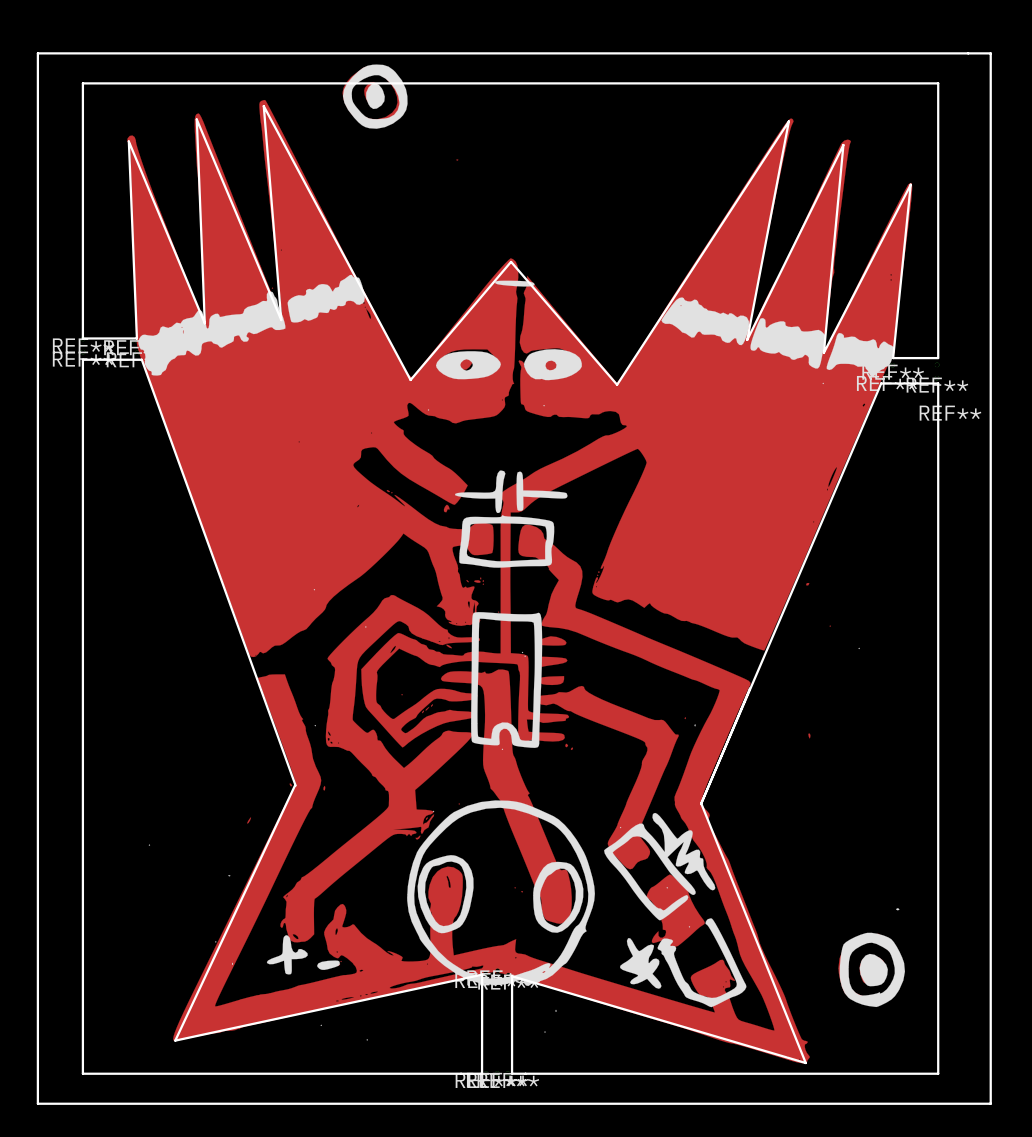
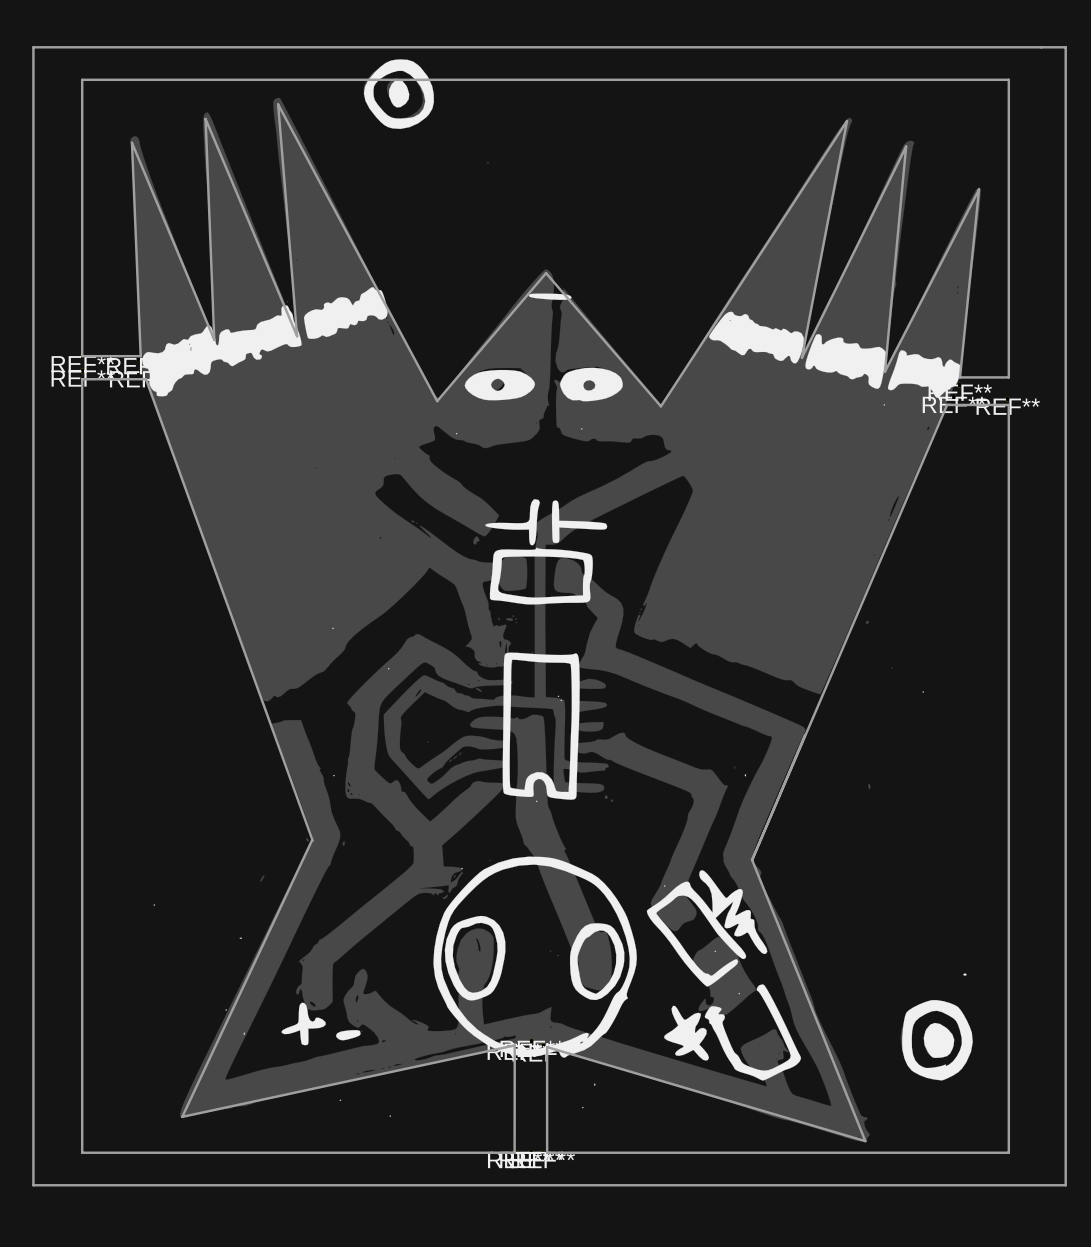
REF**: (937, 364) -> none

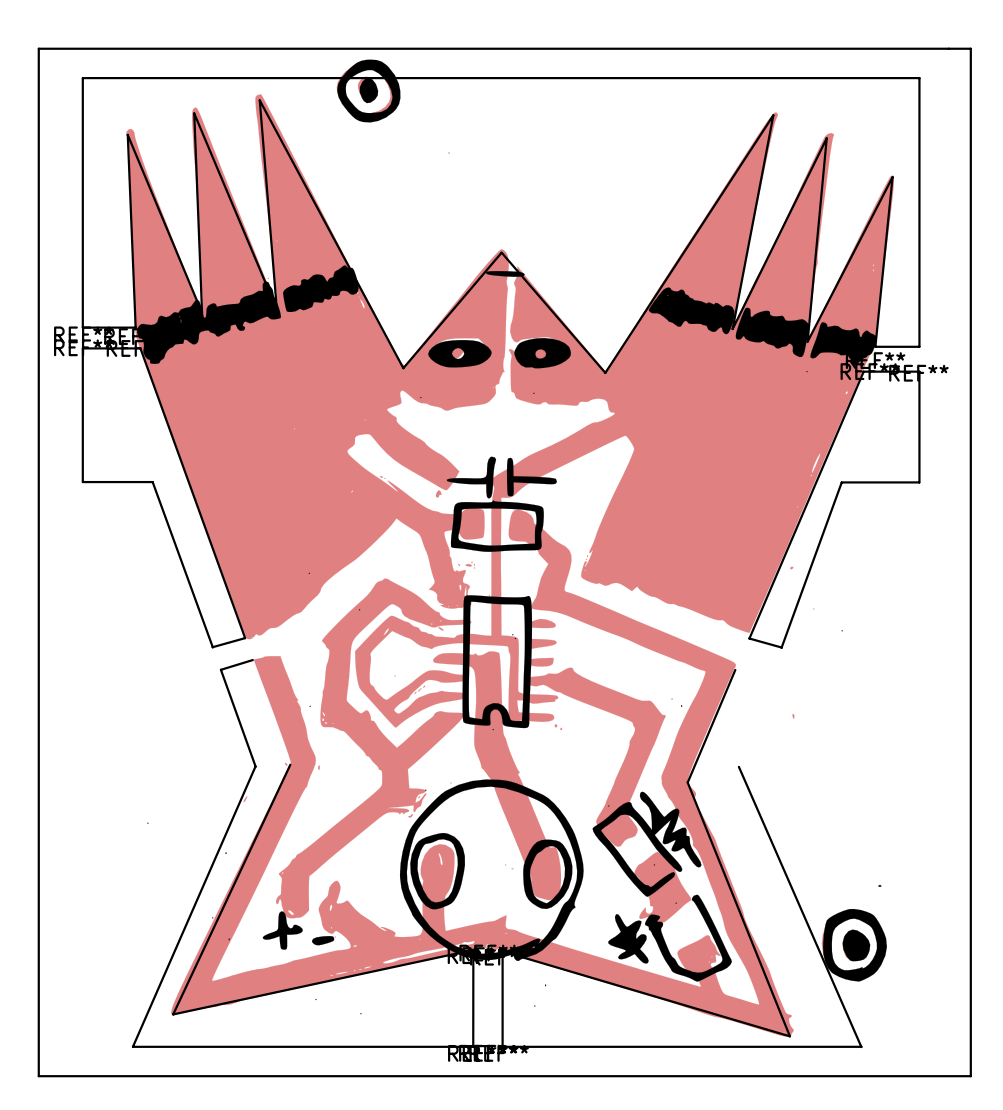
board edge: (145, 379) (312, 840) -> (140, 348) (245, 638) (212, 647)
board edge: (947, 404) (752, 860) -> (863, 371) (749, 638)
board edge: (82, 527) (82, 1152) (137, 1152) -> (255, 766) (132, 1046)
board edge: none -> (82, 482) (152, 482)
board edge: none -> (152, 482) (212, 647)
board edge: none -> (841, 482) (919, 482)
board edge: none -> (841, 482) (781, 647)
board edge: (1008, 527) (1008, 1152) (944, 1152) -> (738, 766) (861, 1047)
board edge: none -> (749, 638) (781, 647)
board edge: none -> (252, 660) (220, 669) (255, 766)

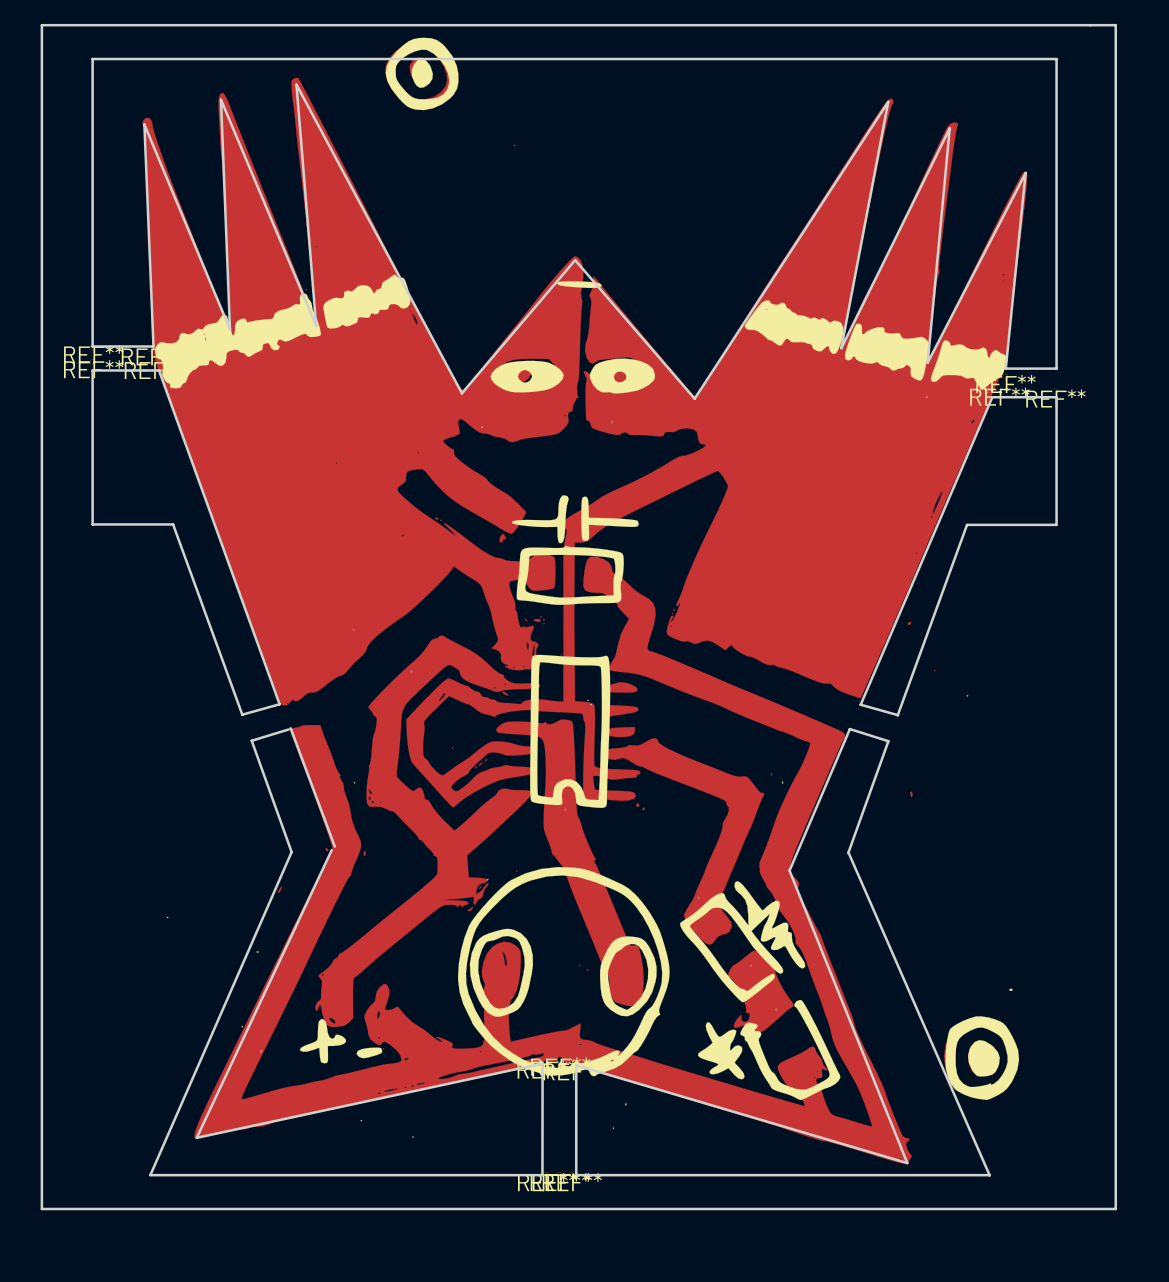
board edge: none -> (290, 728) (334, 846)
board edge: (735, 669) (687, 782) -> (848, 852) (888, 741) (849, 729) (789, 870)

